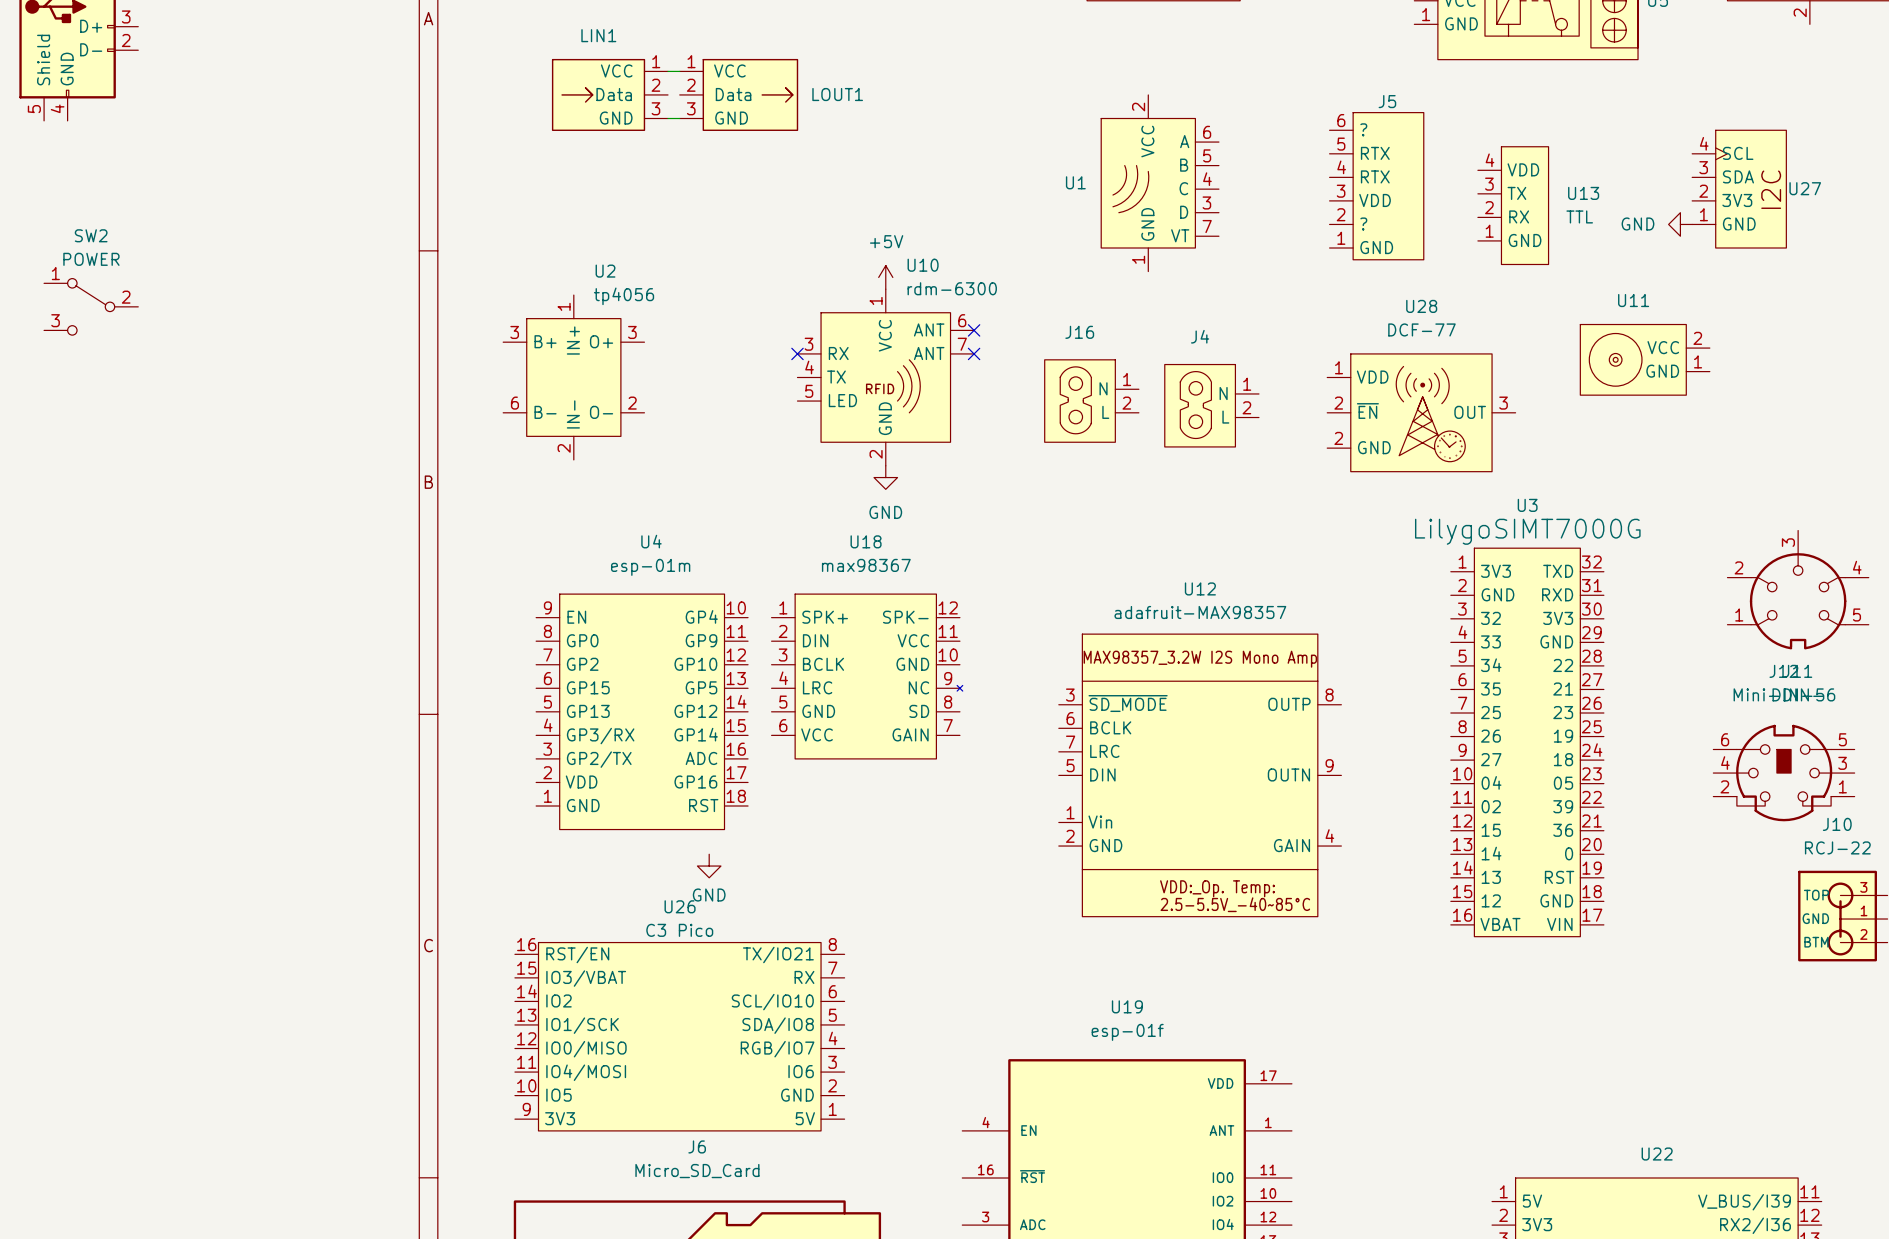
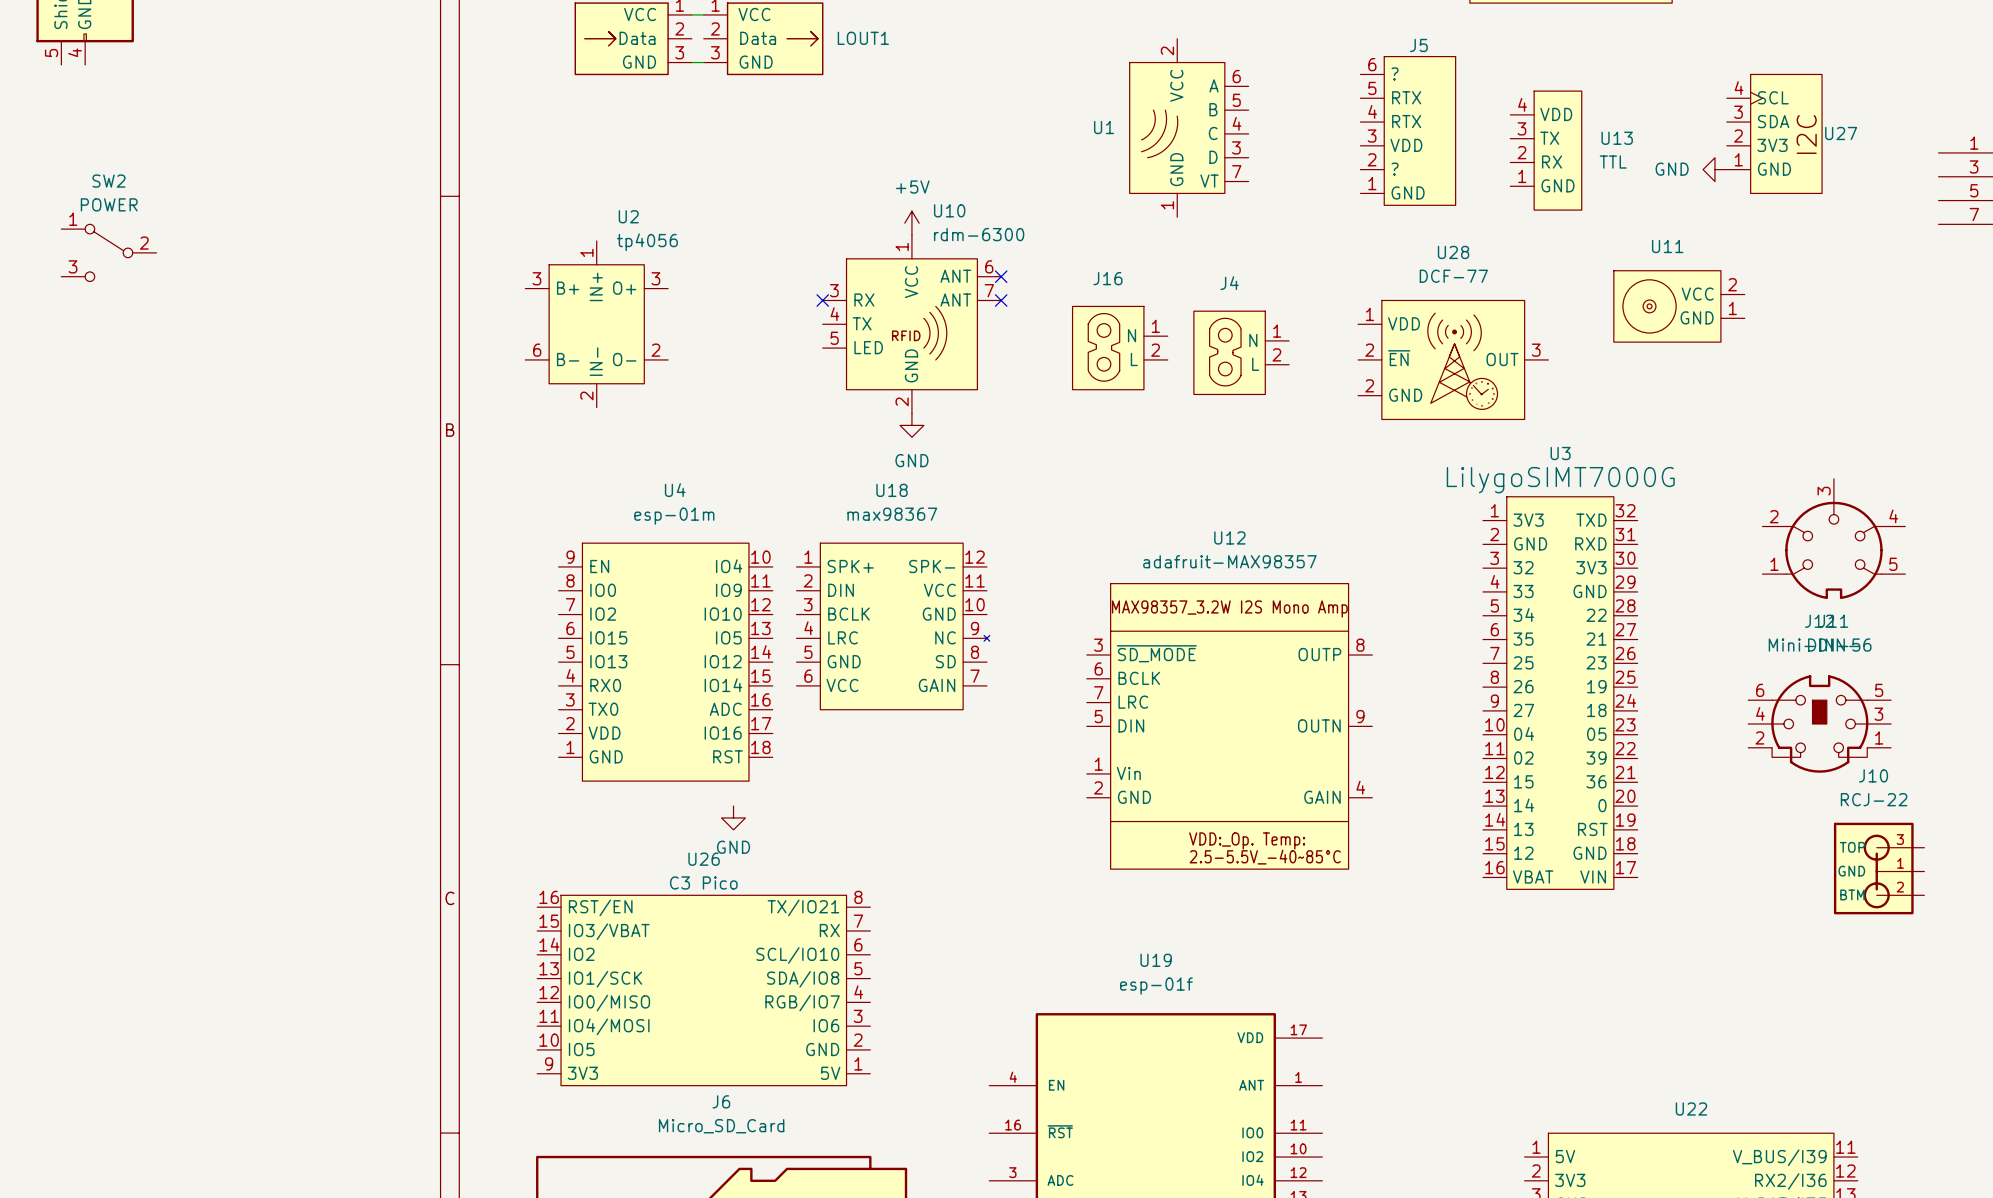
U4 symbol: [536, 594, 749, 830] -> [558, 543, 773, 782]

